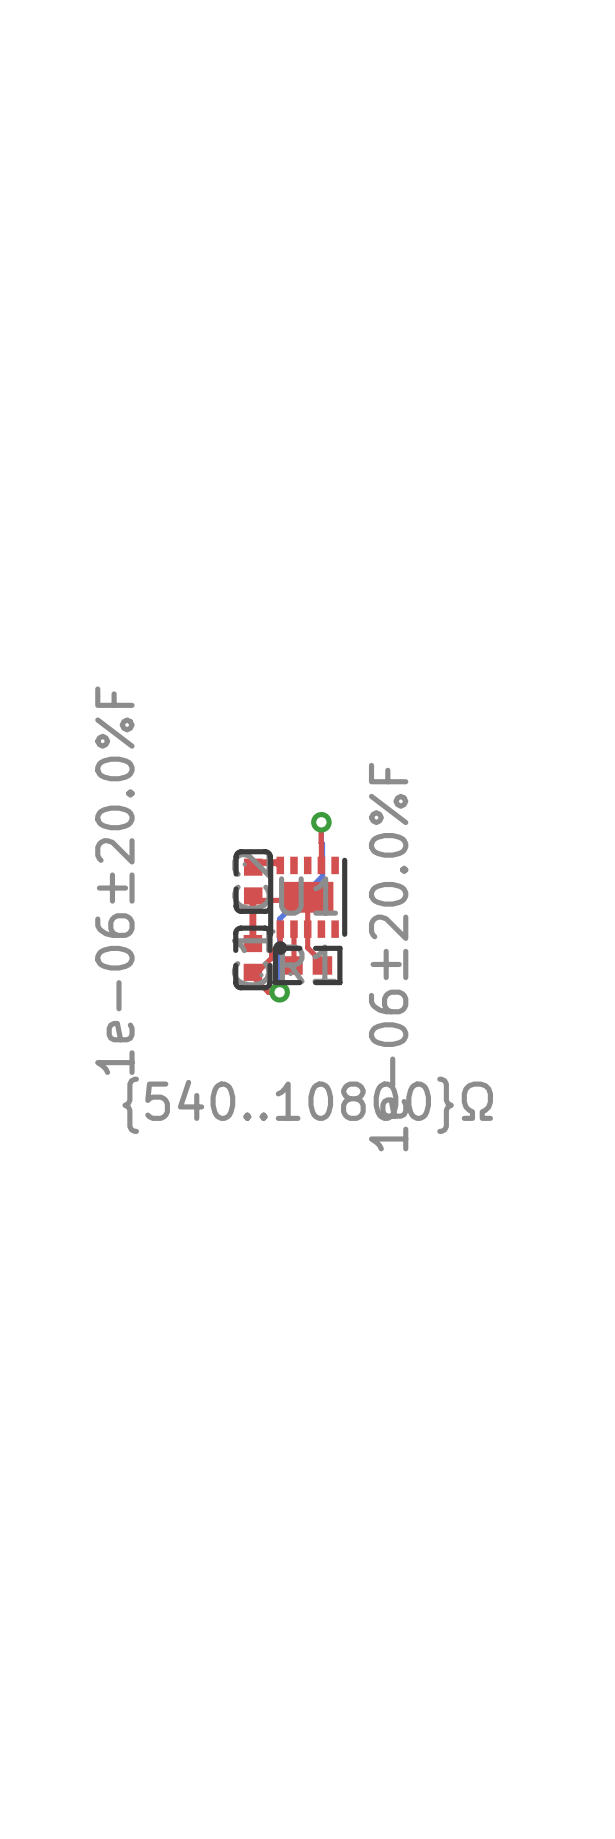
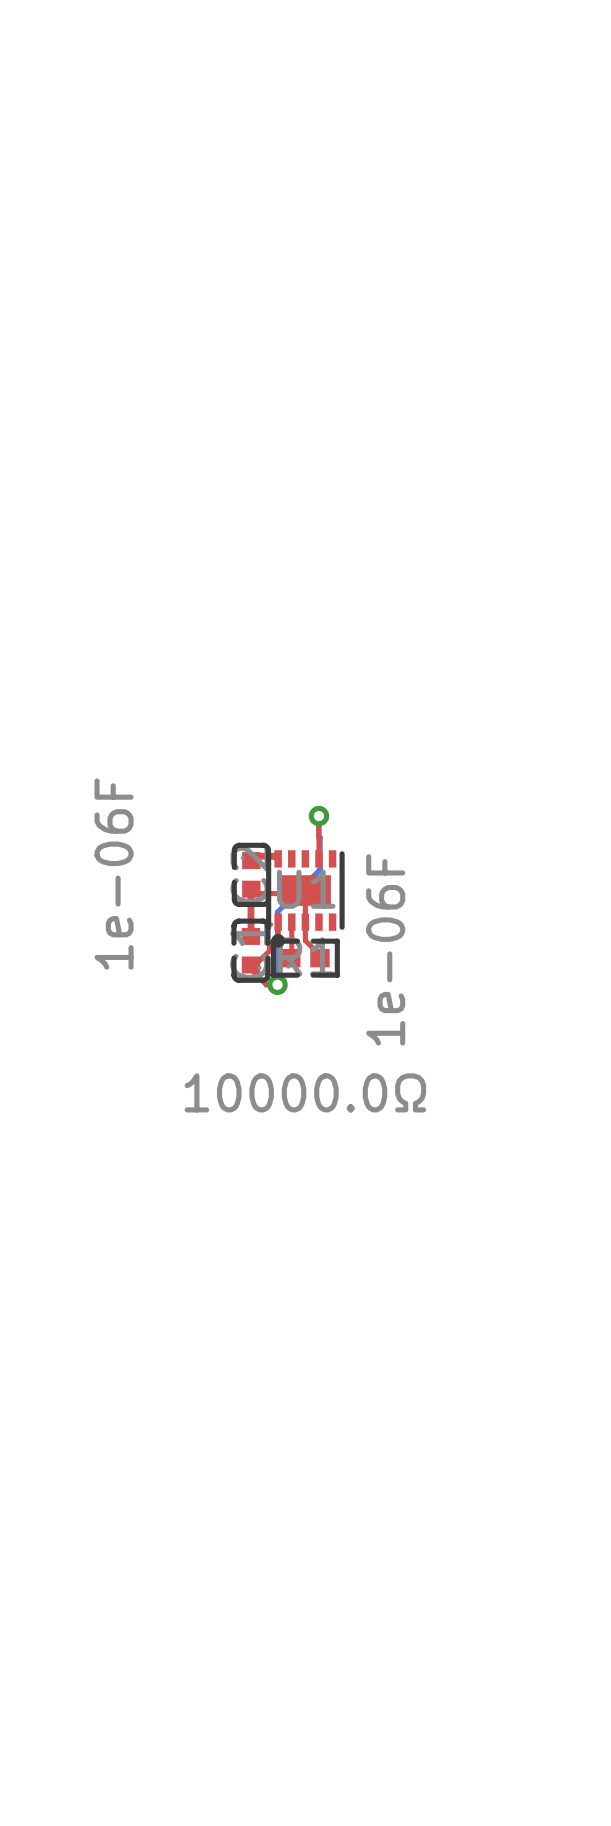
part value: 1e-06±20.0%F (114, 880) -> 1e-06F (114, 874)
part value: 1e-06±20.0%F (388, 957) -> 1e-06F (385, 949)
part value: {540..10800}Ω (307, 1105) -> 10000.0Ω (305, 1092)

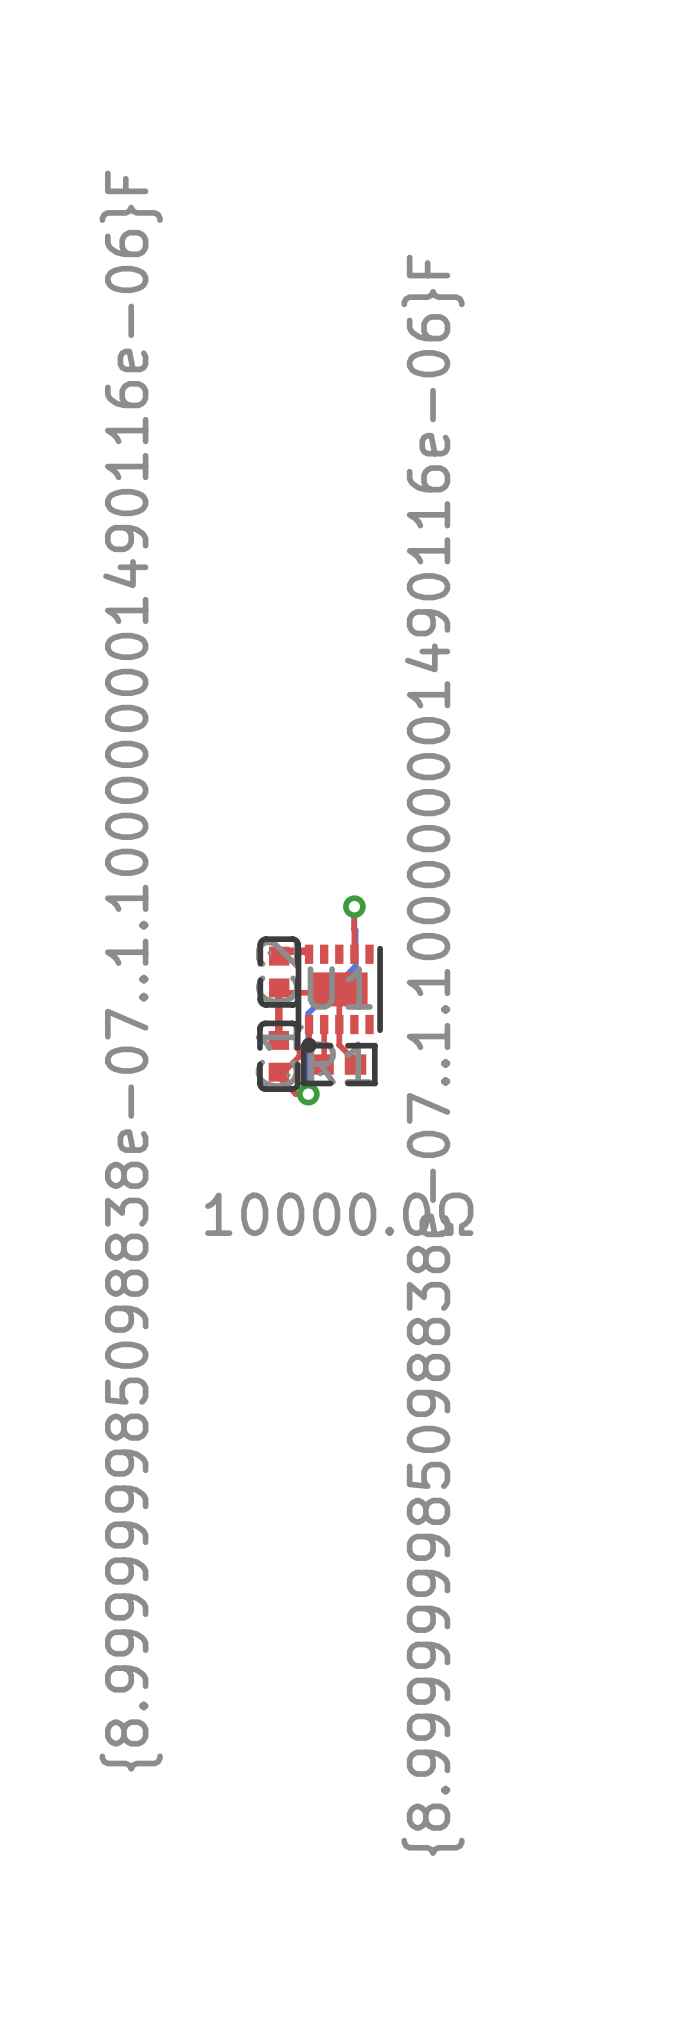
part value: 1e-06F (114, 874) -> {8.999999985098838e-07..1.100000001490116e-06}F (131, 971)
part value: 1e-06F (385, 949) -> {8.999999985098838e-07..1.100000001490116e-06}F (433, 1055)

